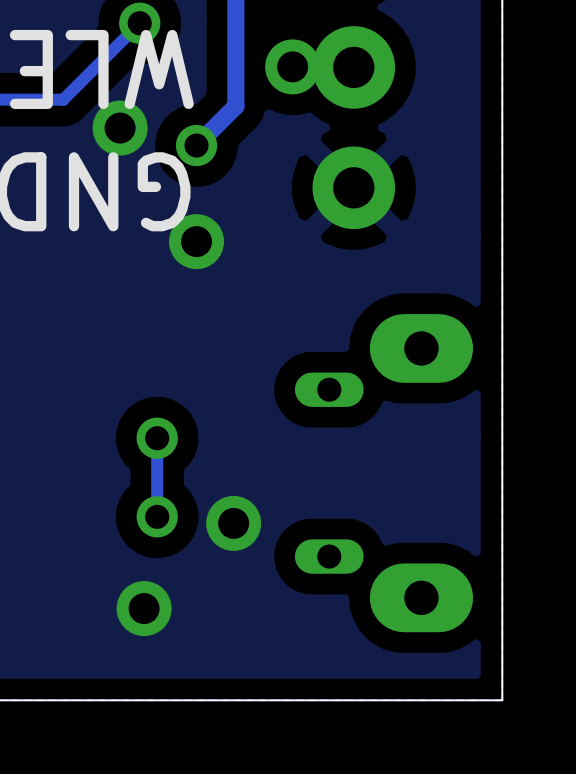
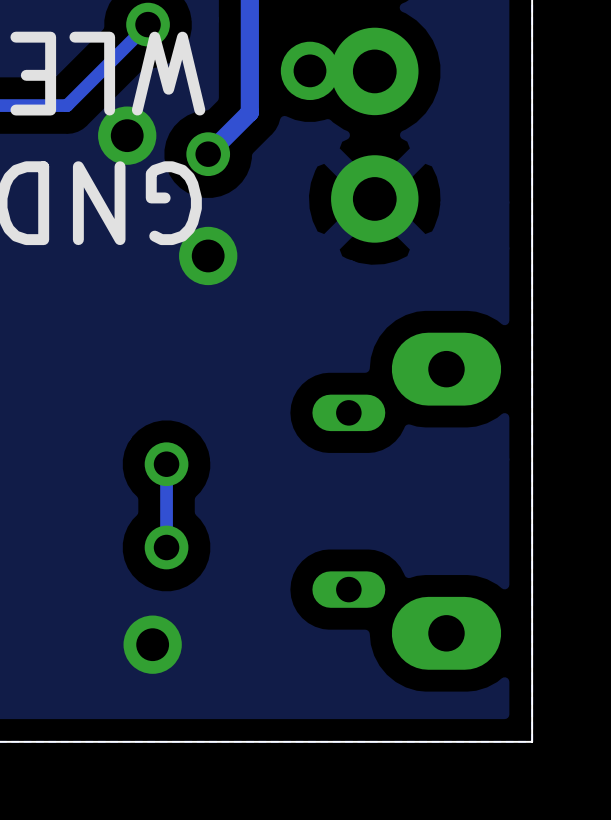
via: (233, 523) -> none

